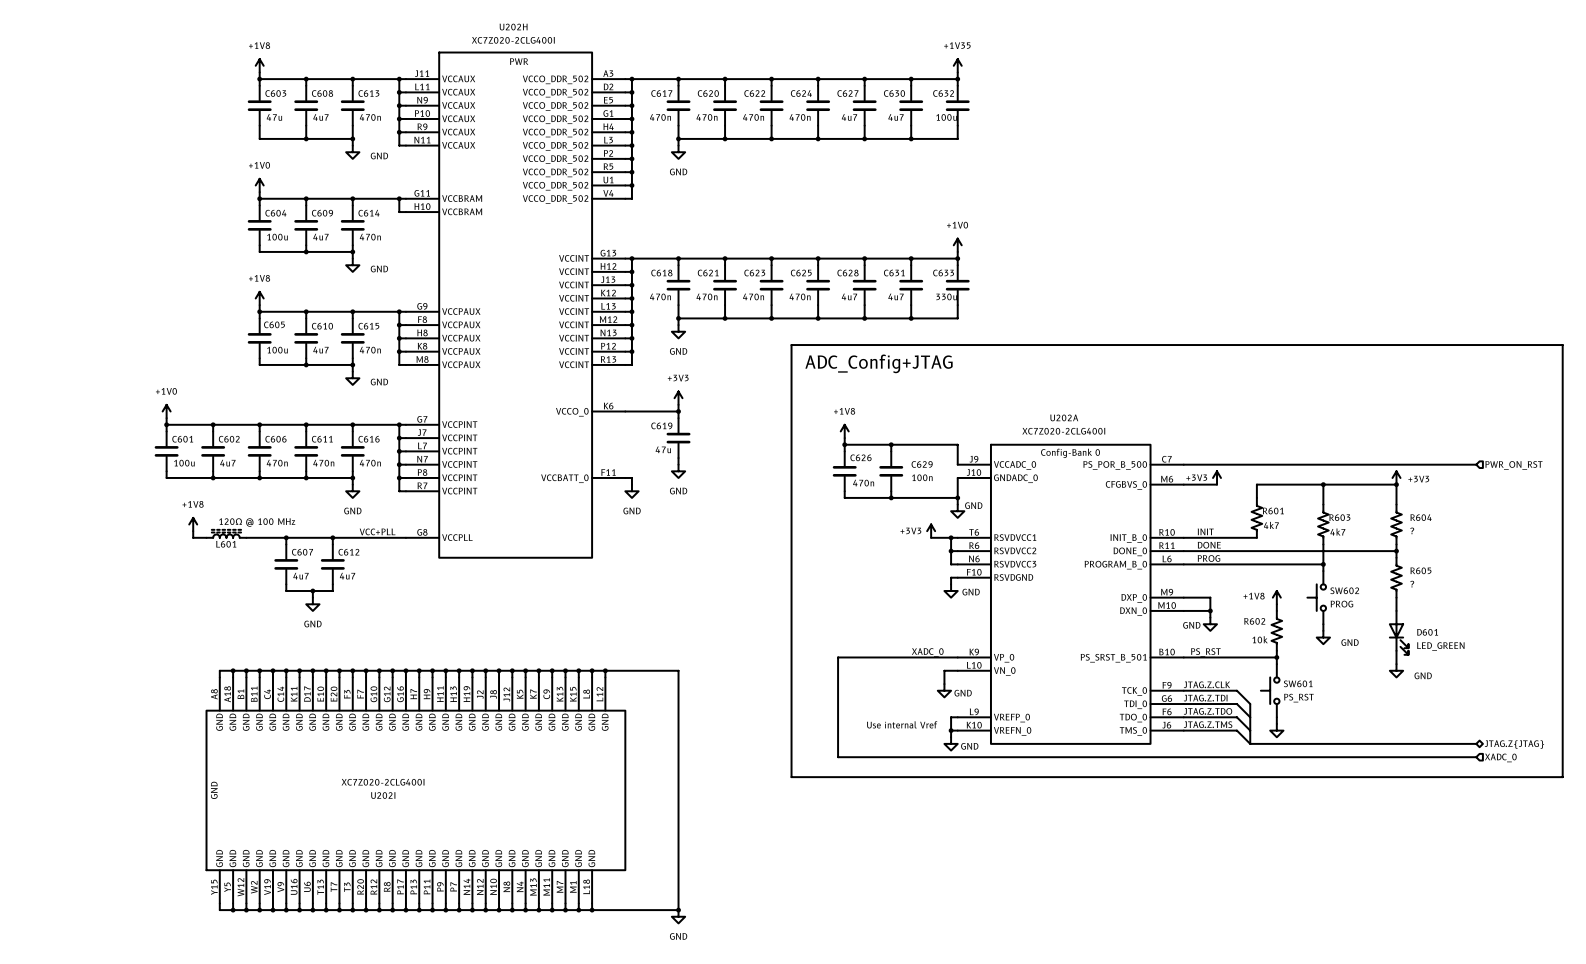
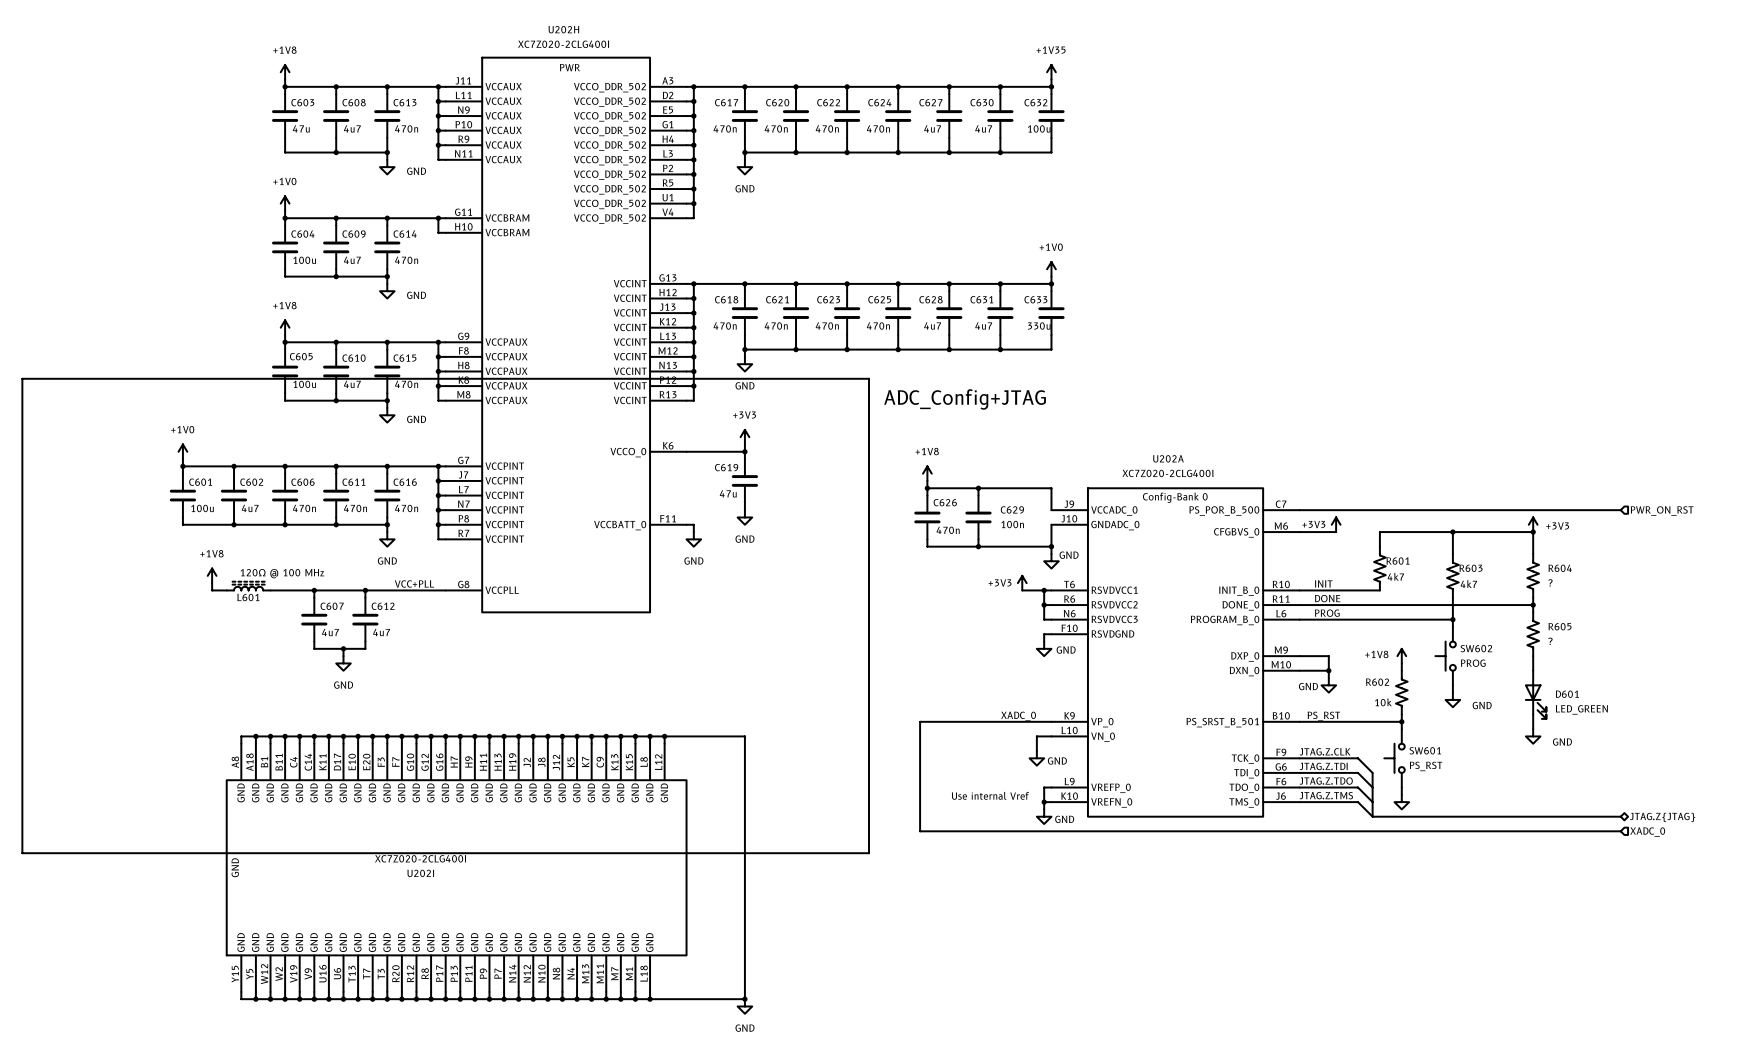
line: (791, 345) (1562, 345) (1562, 777) (791, 777) -> (869, 378) (22, 378) (22, 853) (869, 853)

